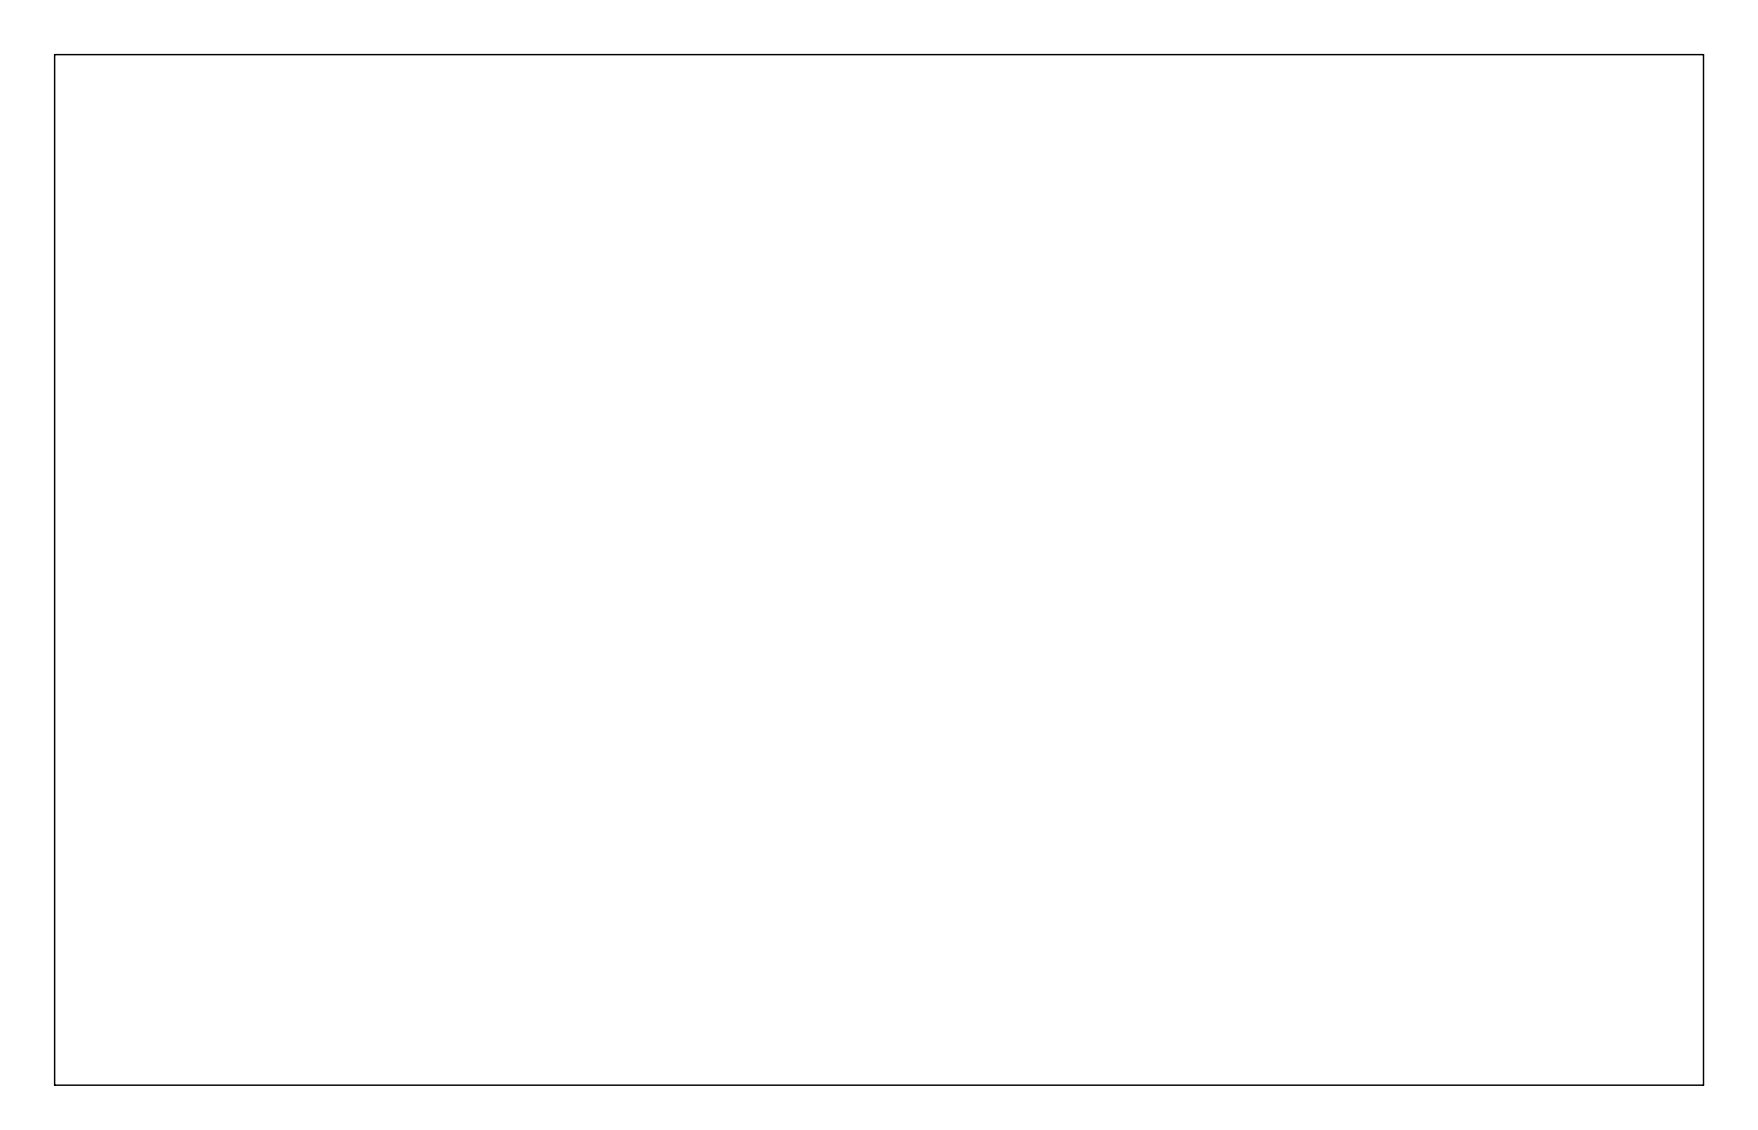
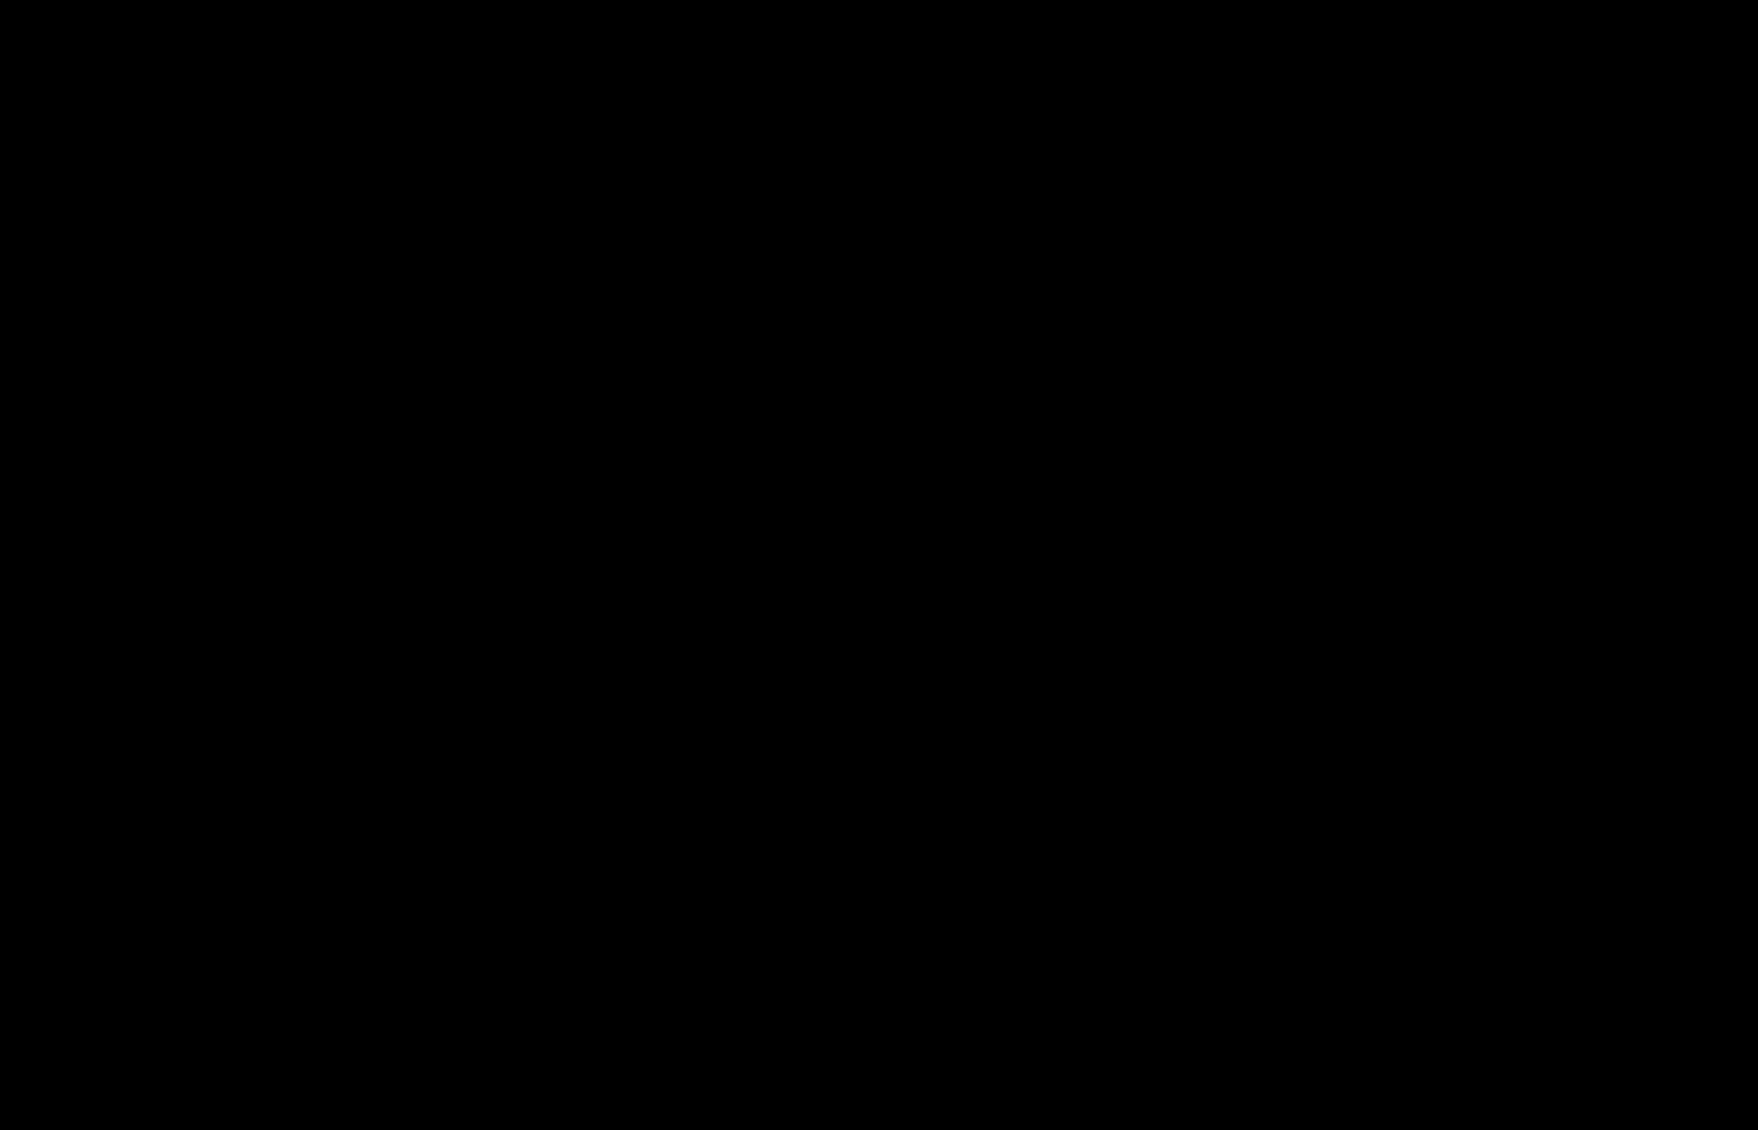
board edge: (1703, 54) (54, 54) (54, 1085) (1703, 1085) (1703, 54) -> none

